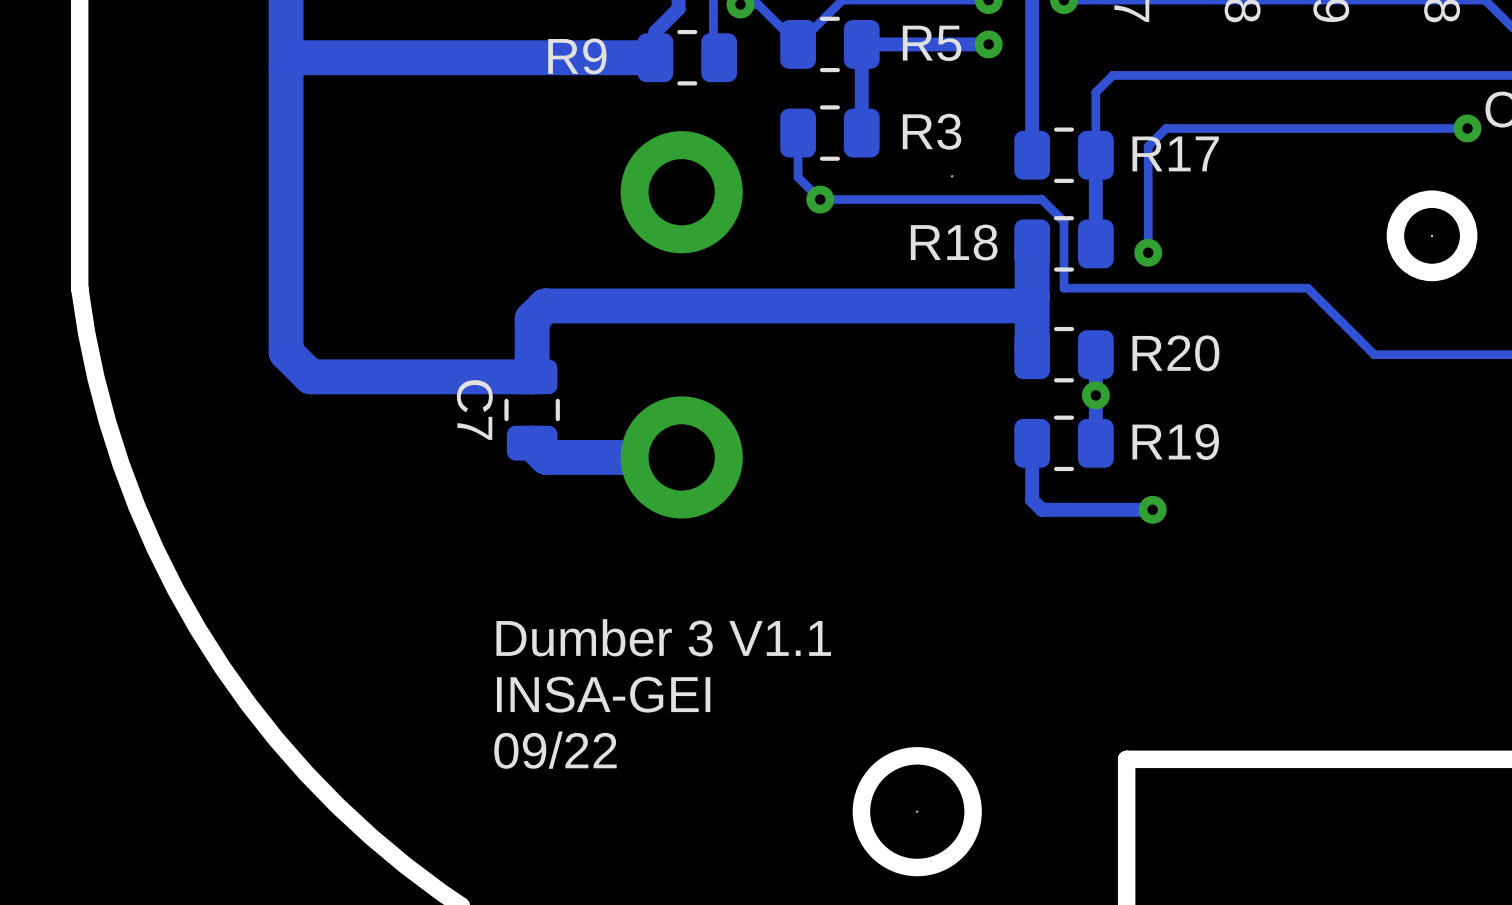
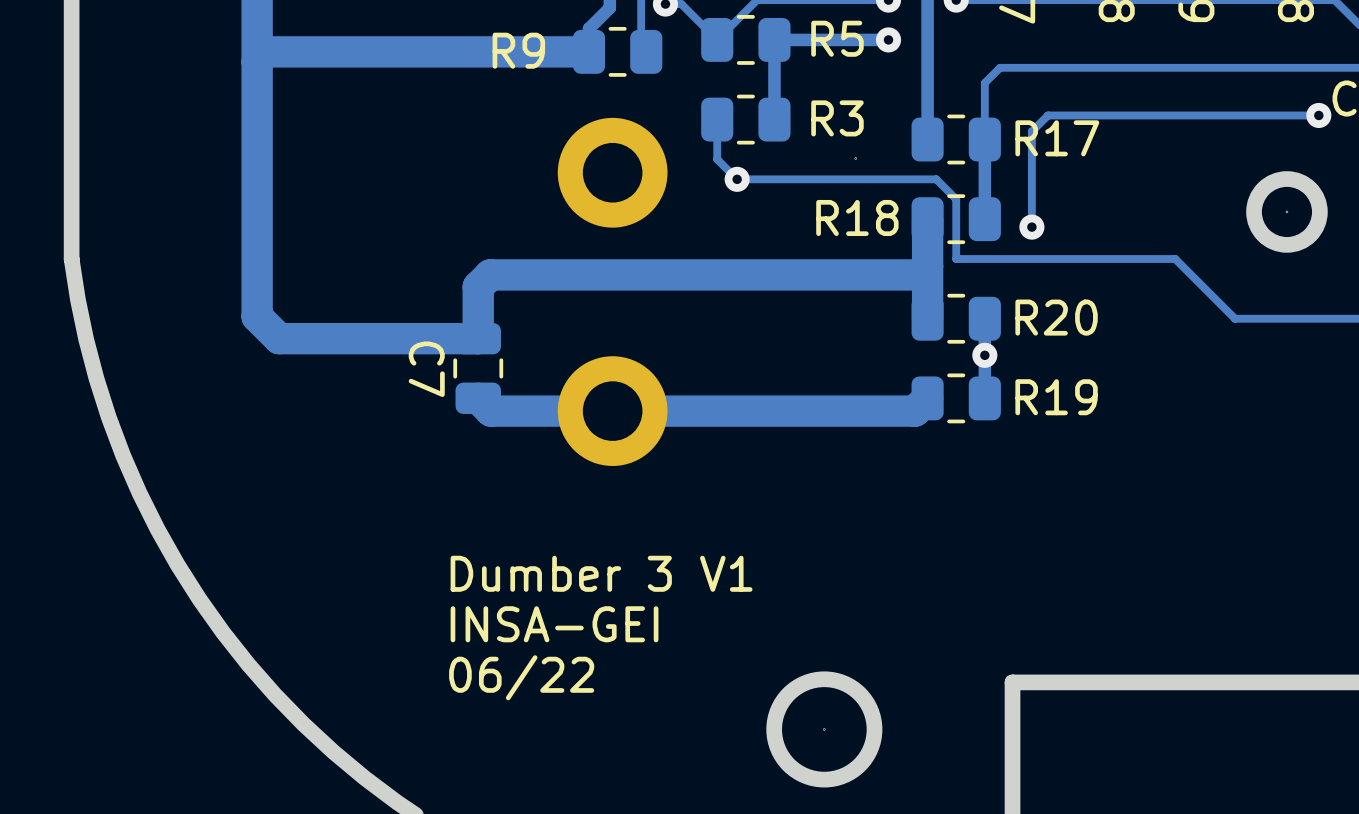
track: (1032, 443) (1032, 500) (1041, 509) (1152, 509) -> none
track: none -> (925, 400) (927, 398) (914, 411) (612, 411)
via: (1152, 509) -> none
text: Dumber 3 V1.1 (663, 637) -> Dumber 3 V1 (601, 573)
text: 09/22 (555, 750) -> 06/22 (521, 677)

